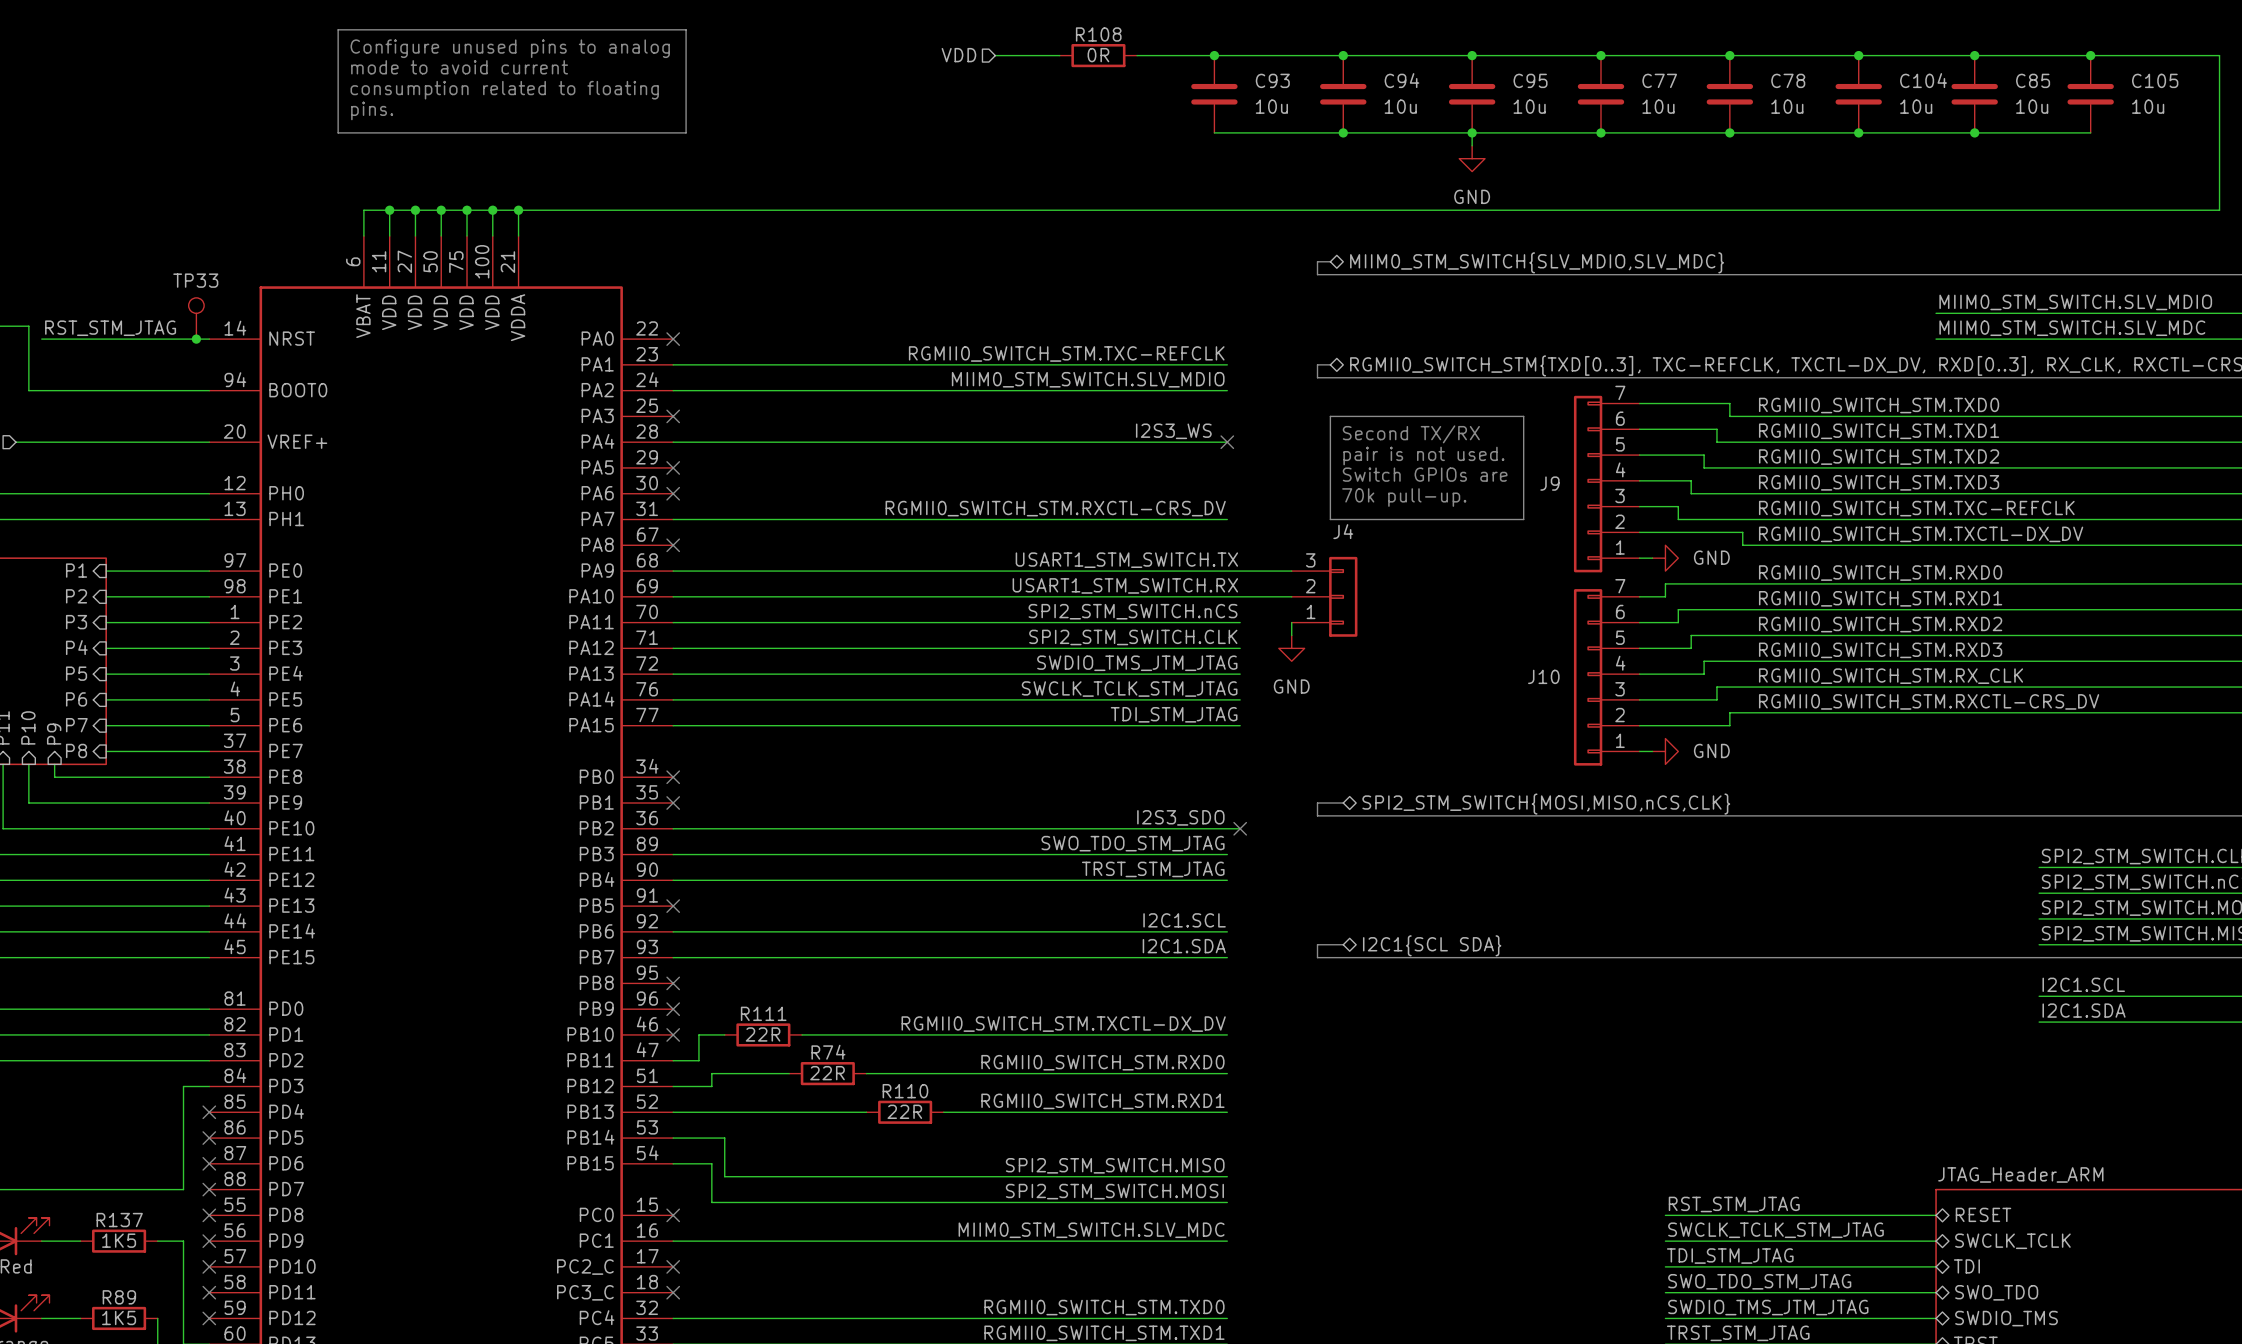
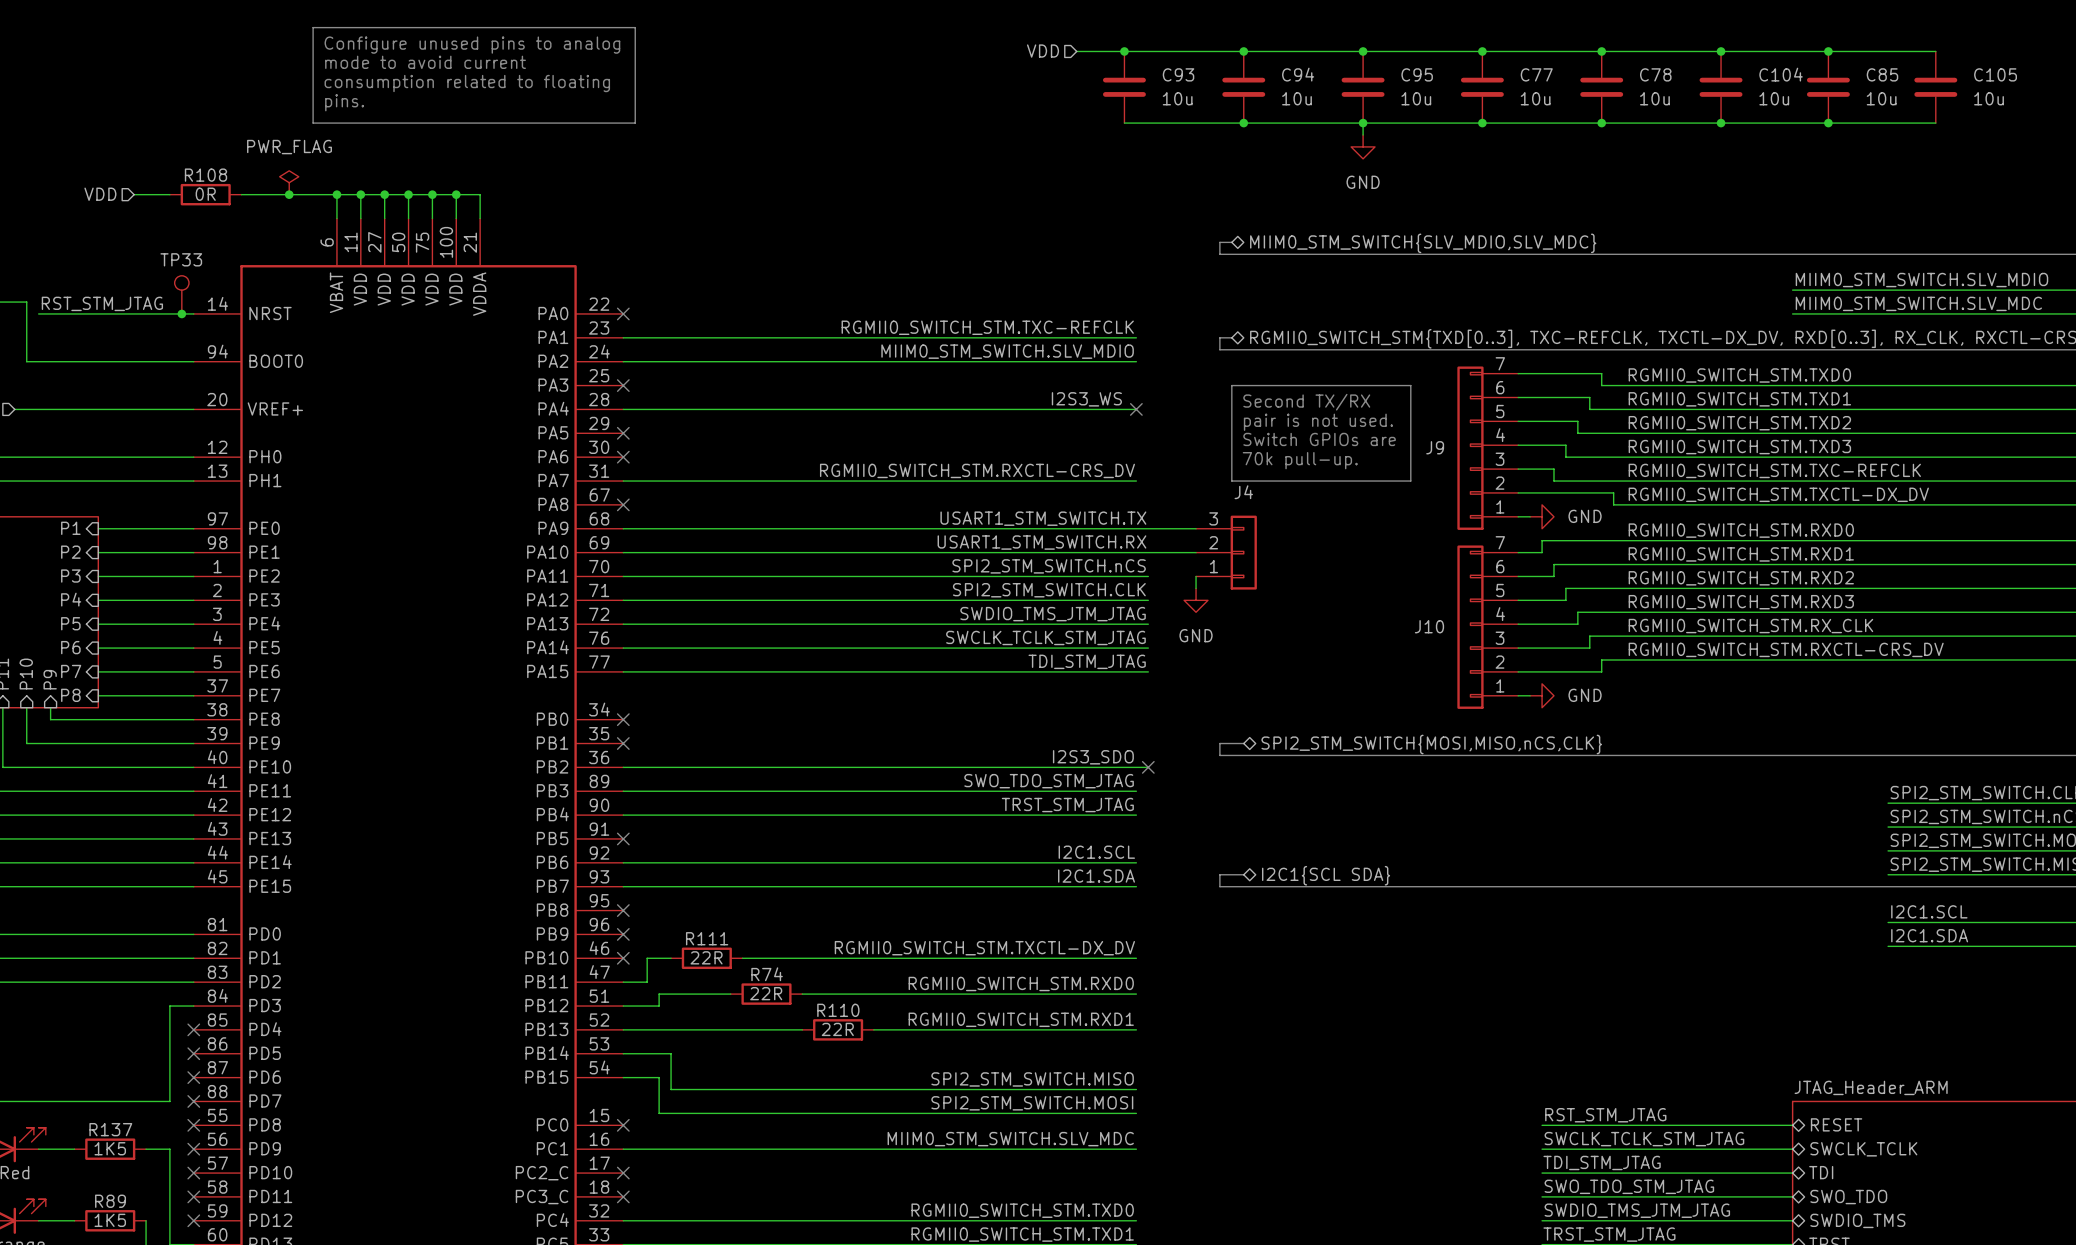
hierarchical label position: VDD (958, 55) -> VDD (1043, 51)
wire: (995, 55) (1059, 55) -> none
R108 position: (1098, 55) -> (205, 194)
wire: (1137, 55) (1162, 55) -> none
wire: (2090, 55) (2219, 55) (2219, 210) (518, 210) -> none
junction: (2090, 55) -> none
power symbol: none -> PWR_FLAG (289, 182)
hierarchical label: none -> VDD (100, 194)
wire: none -> (134, 194) (169, 194)
wire: none -> (241, 194) (336, 194)
junction: none -> (289, 194)
junction: none -> (336, 194)
junction: (518, 210) -> none

